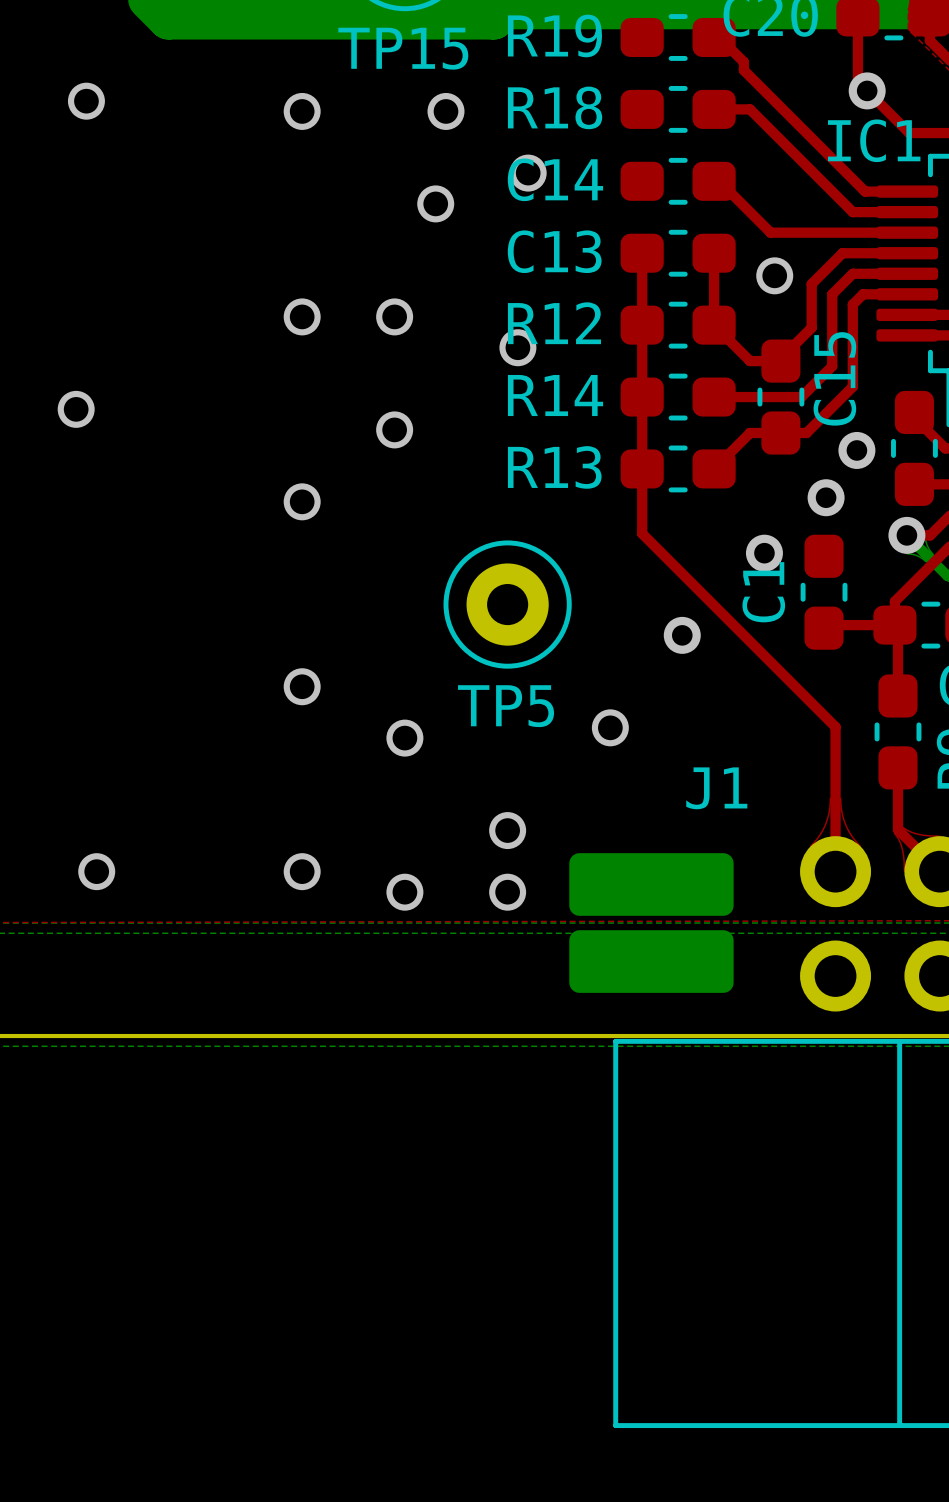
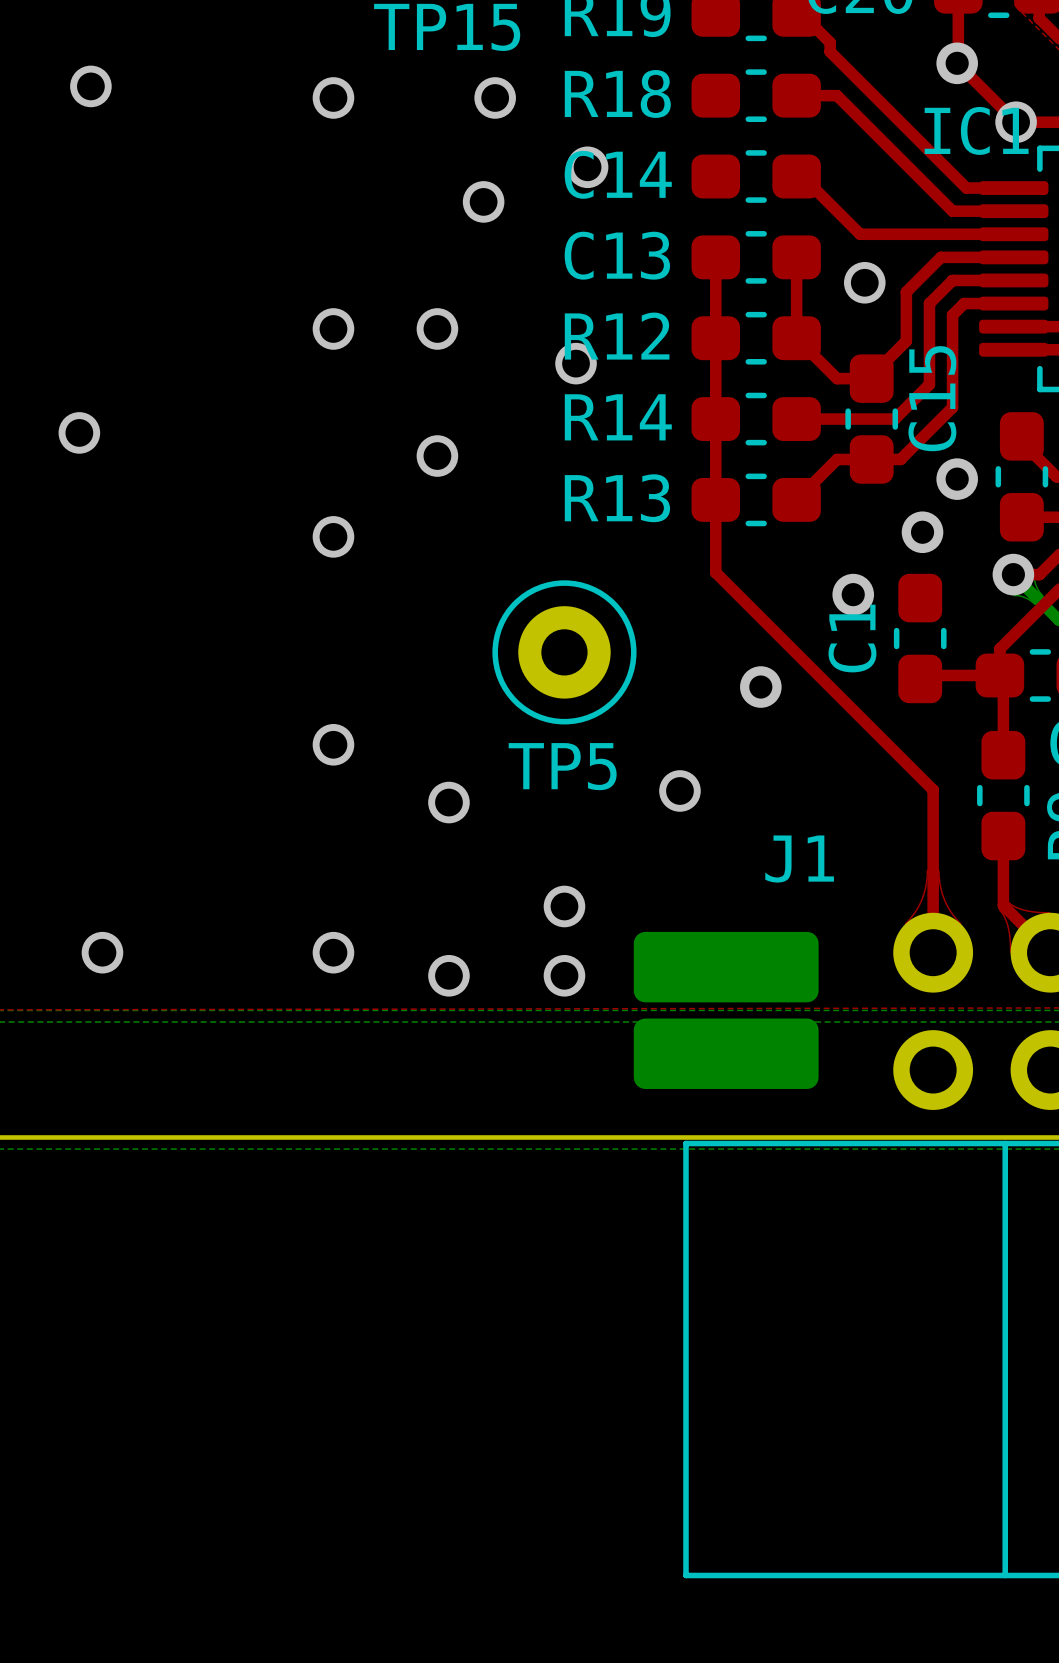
via position: (867, 90) -> (957, 63)
via: none -> (1016, 122)

